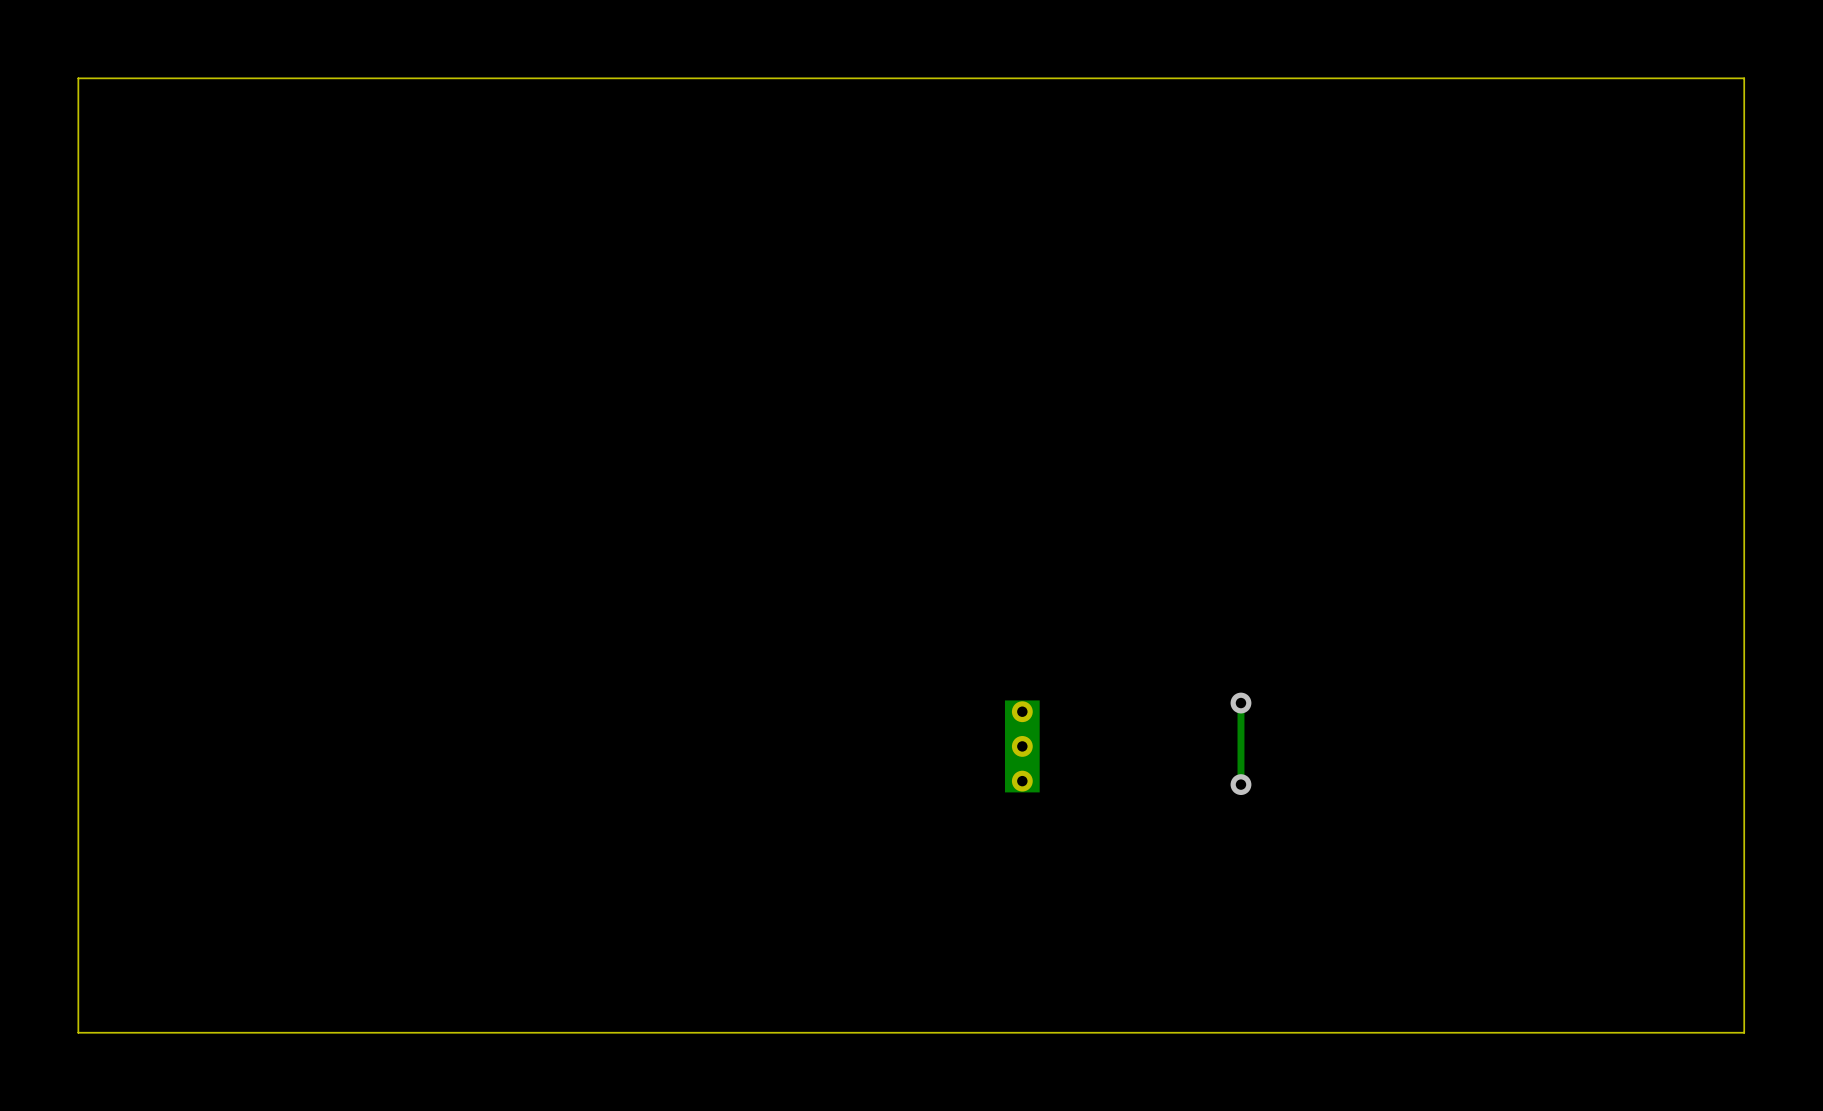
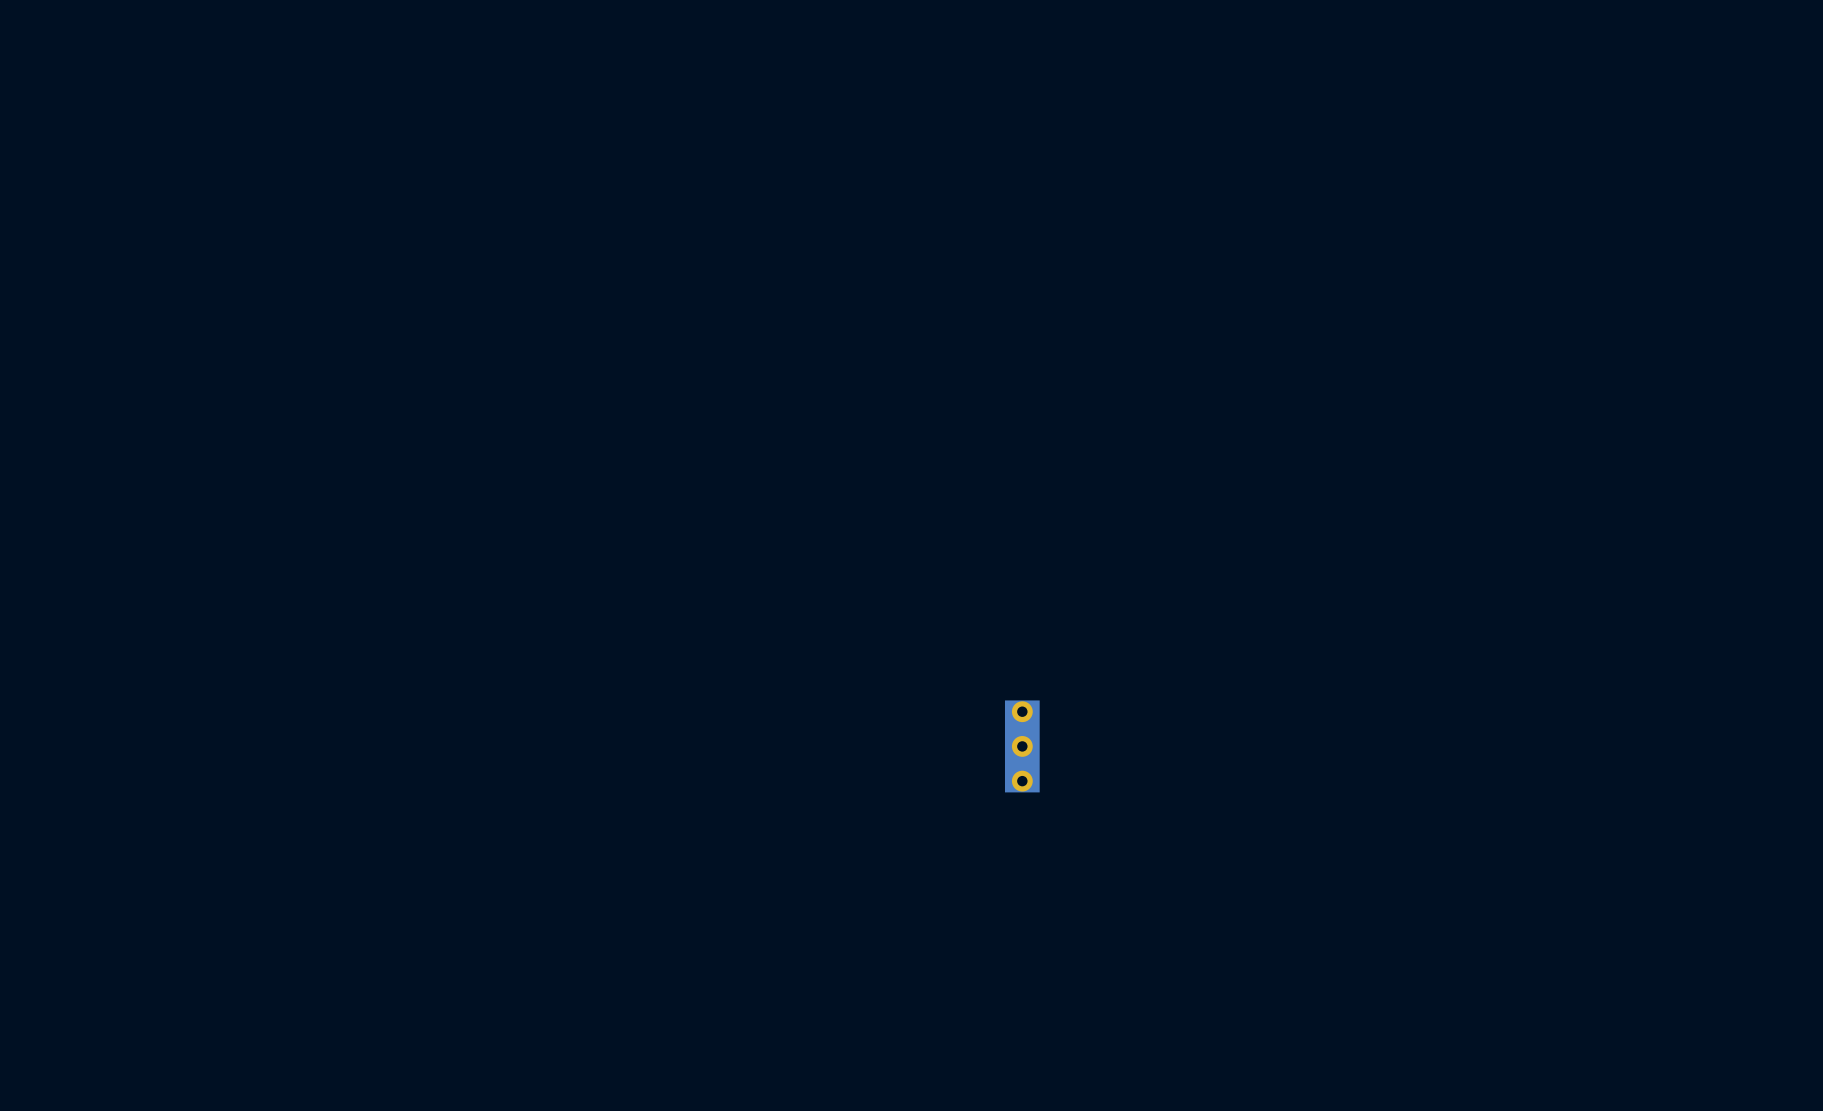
board edge: (1744, 78) (78, 78) (78, 1032) (1744, 1032) (1744, 78) -> none
track: (1240, 703) (1240, 784) -> none
via: (1240, 703) -> none
via: (1240, 784) -> none

